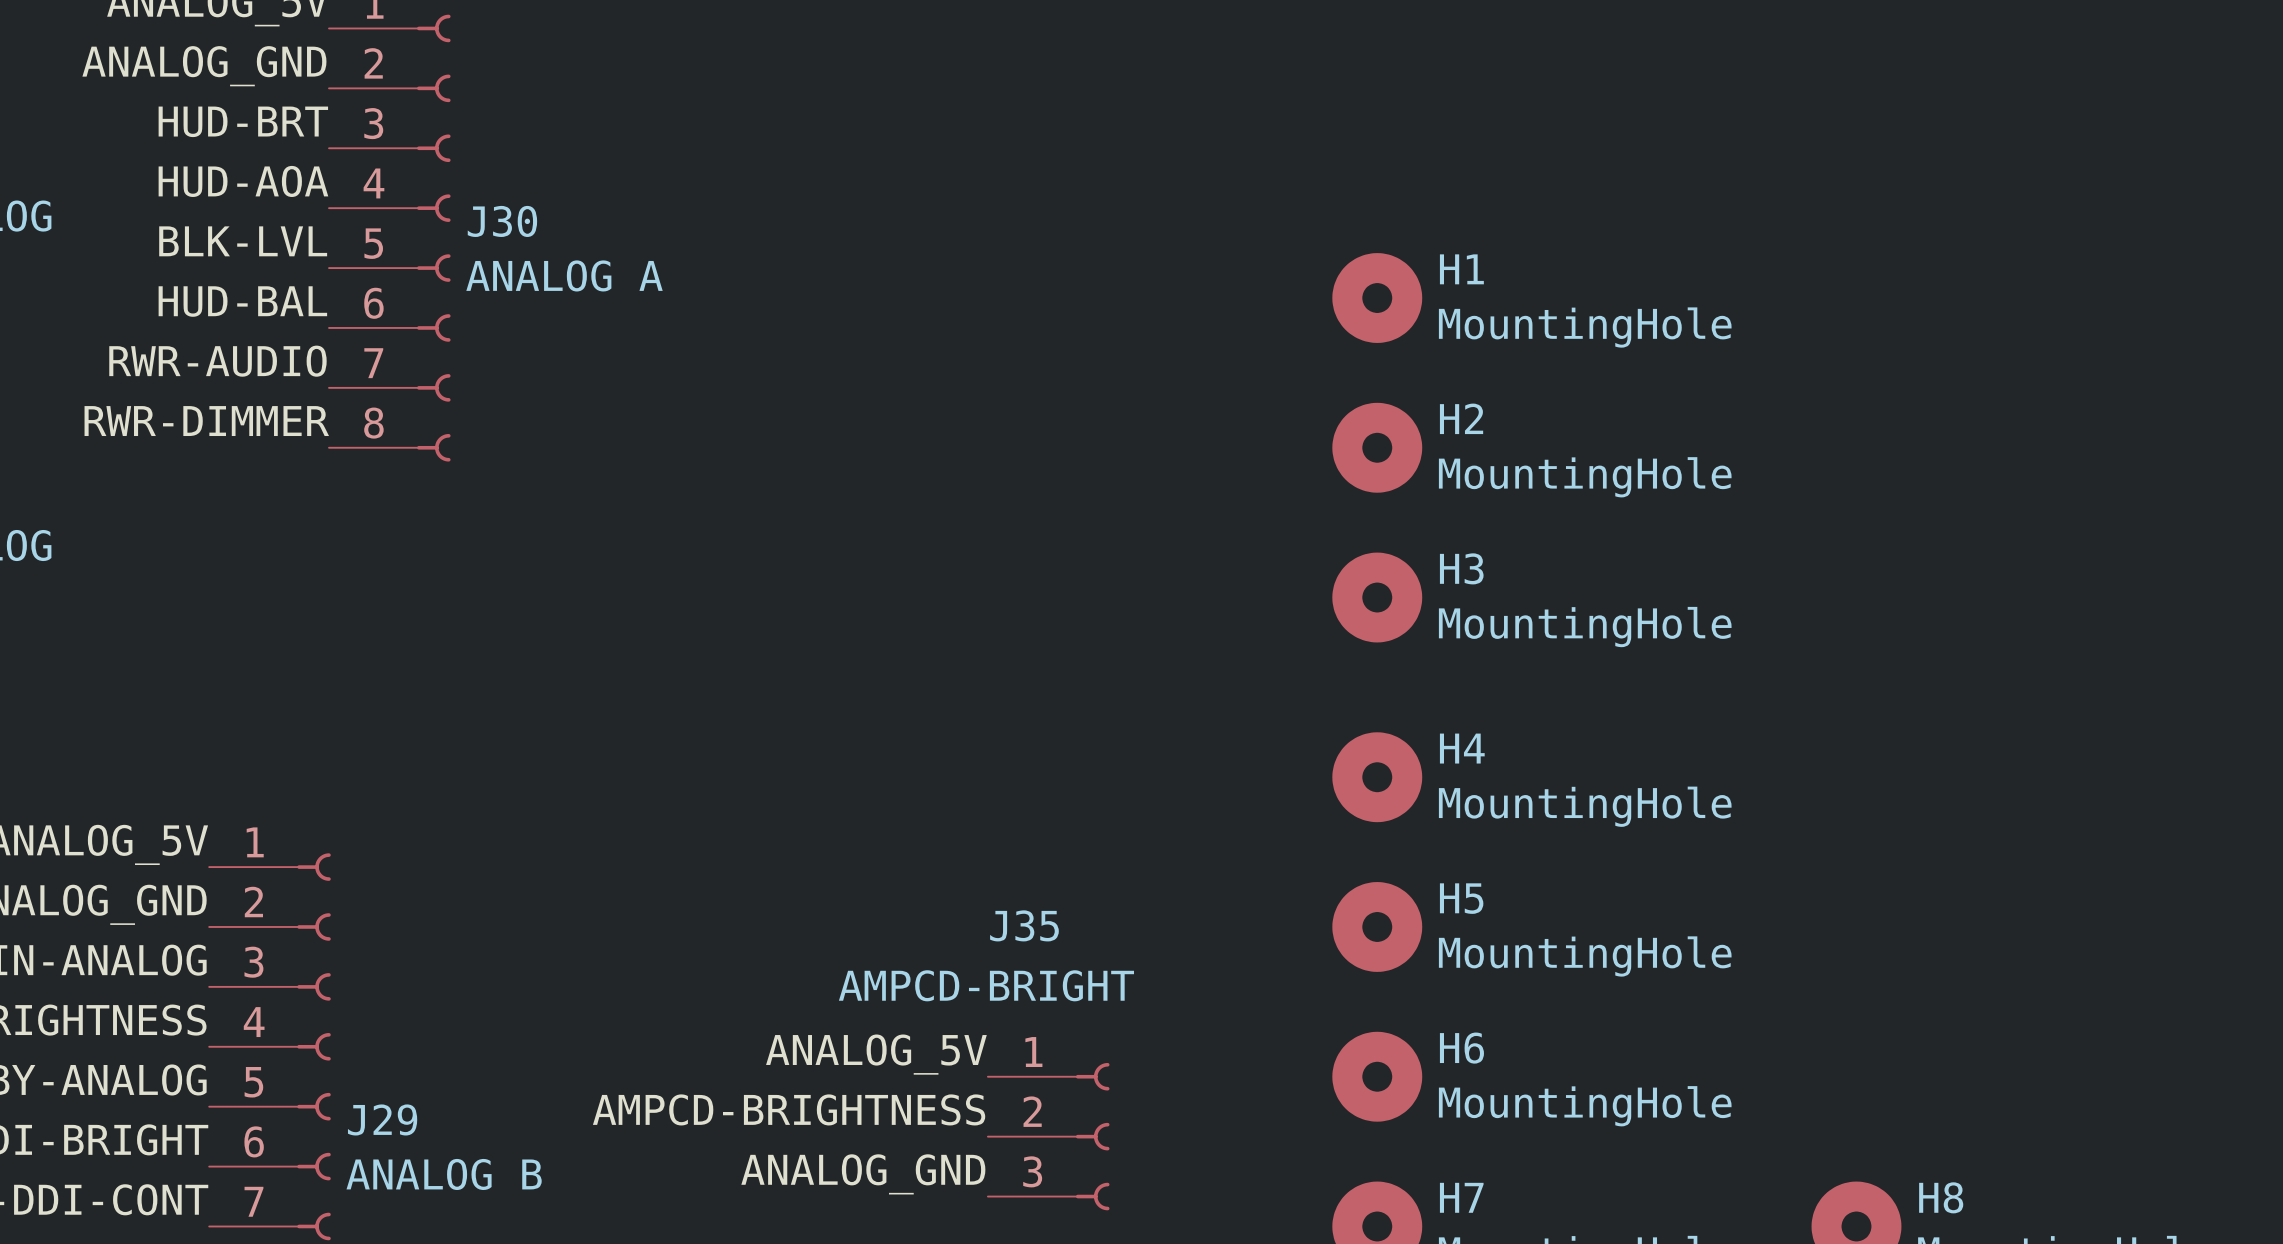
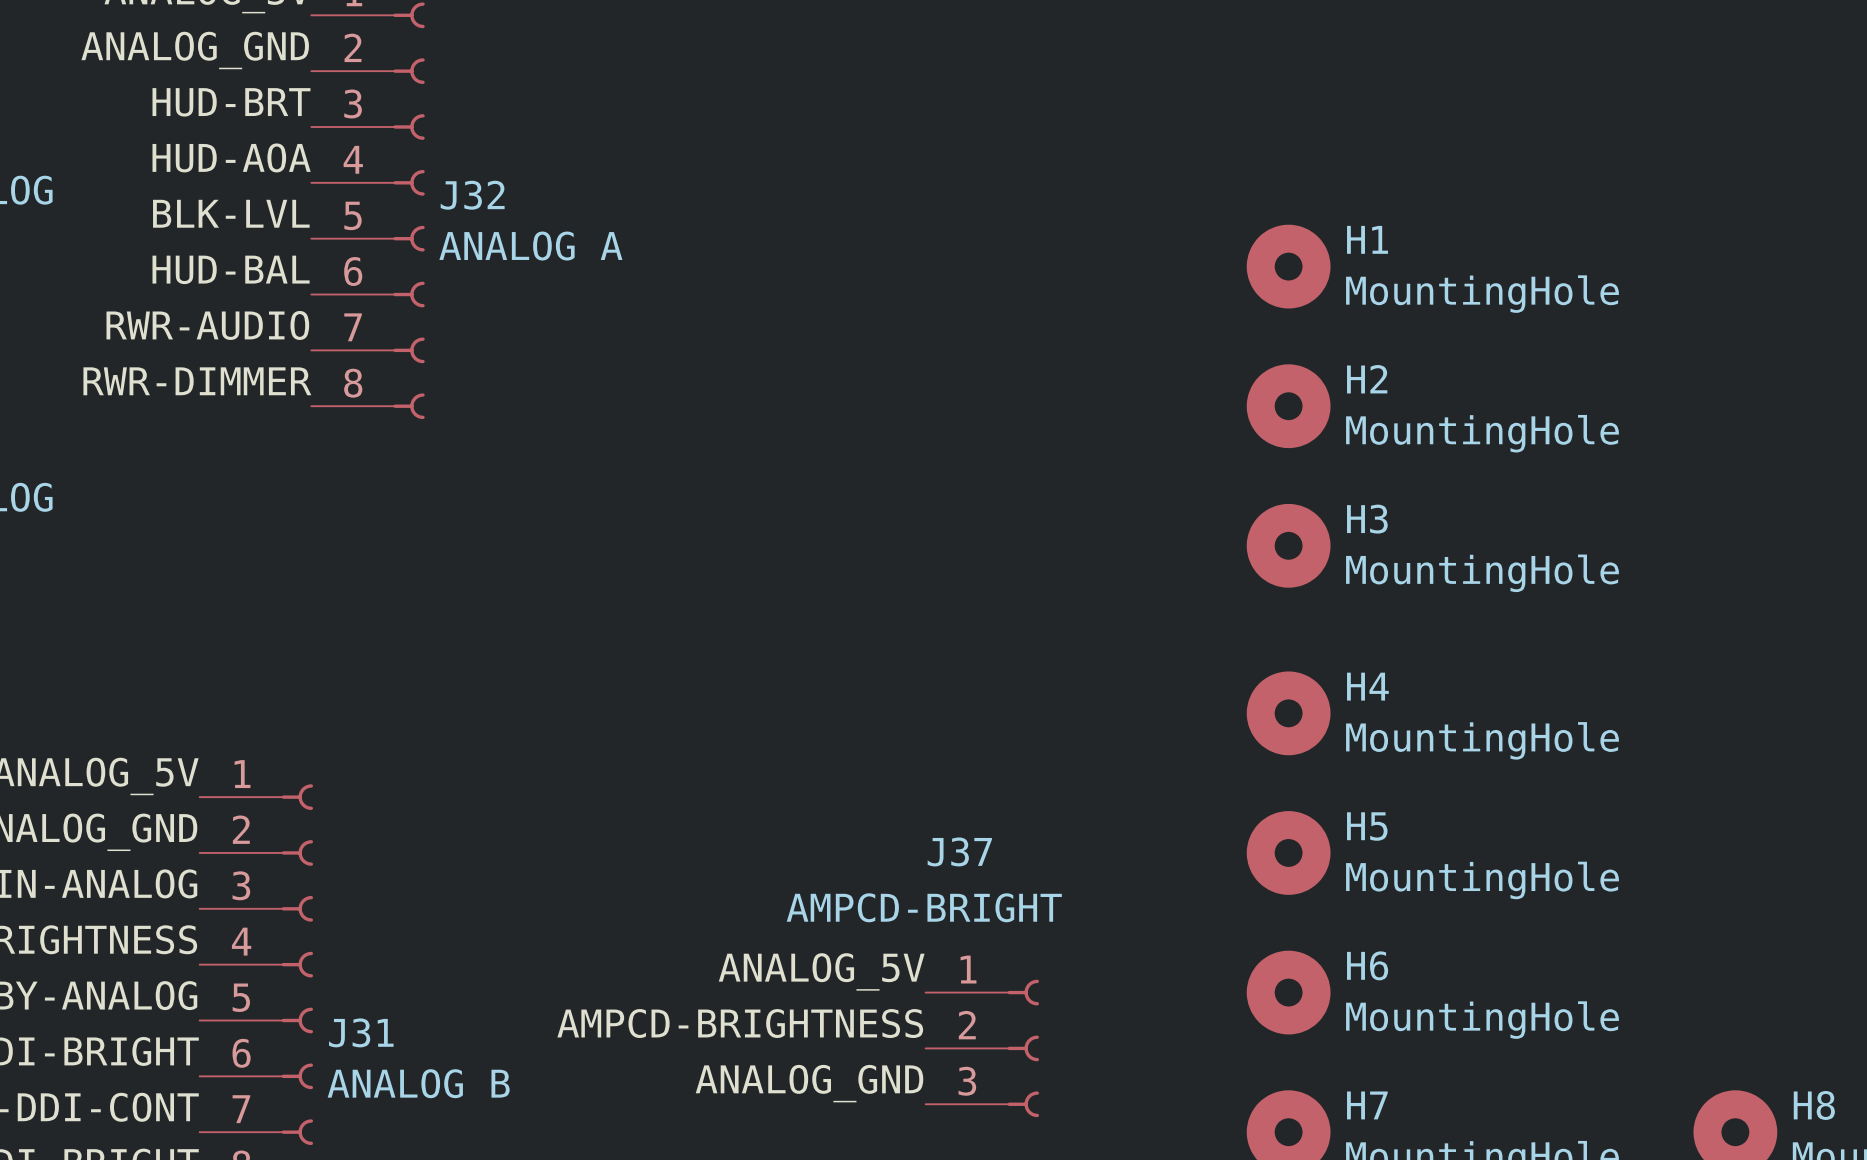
J30 name: J30 (502, 221) -> J32 (472, 195)
J35 name: J35 (1024, 925) -> J37 (959, 851)
J29 name: J29 (382, 1119) -> J31 (361, 1032)

